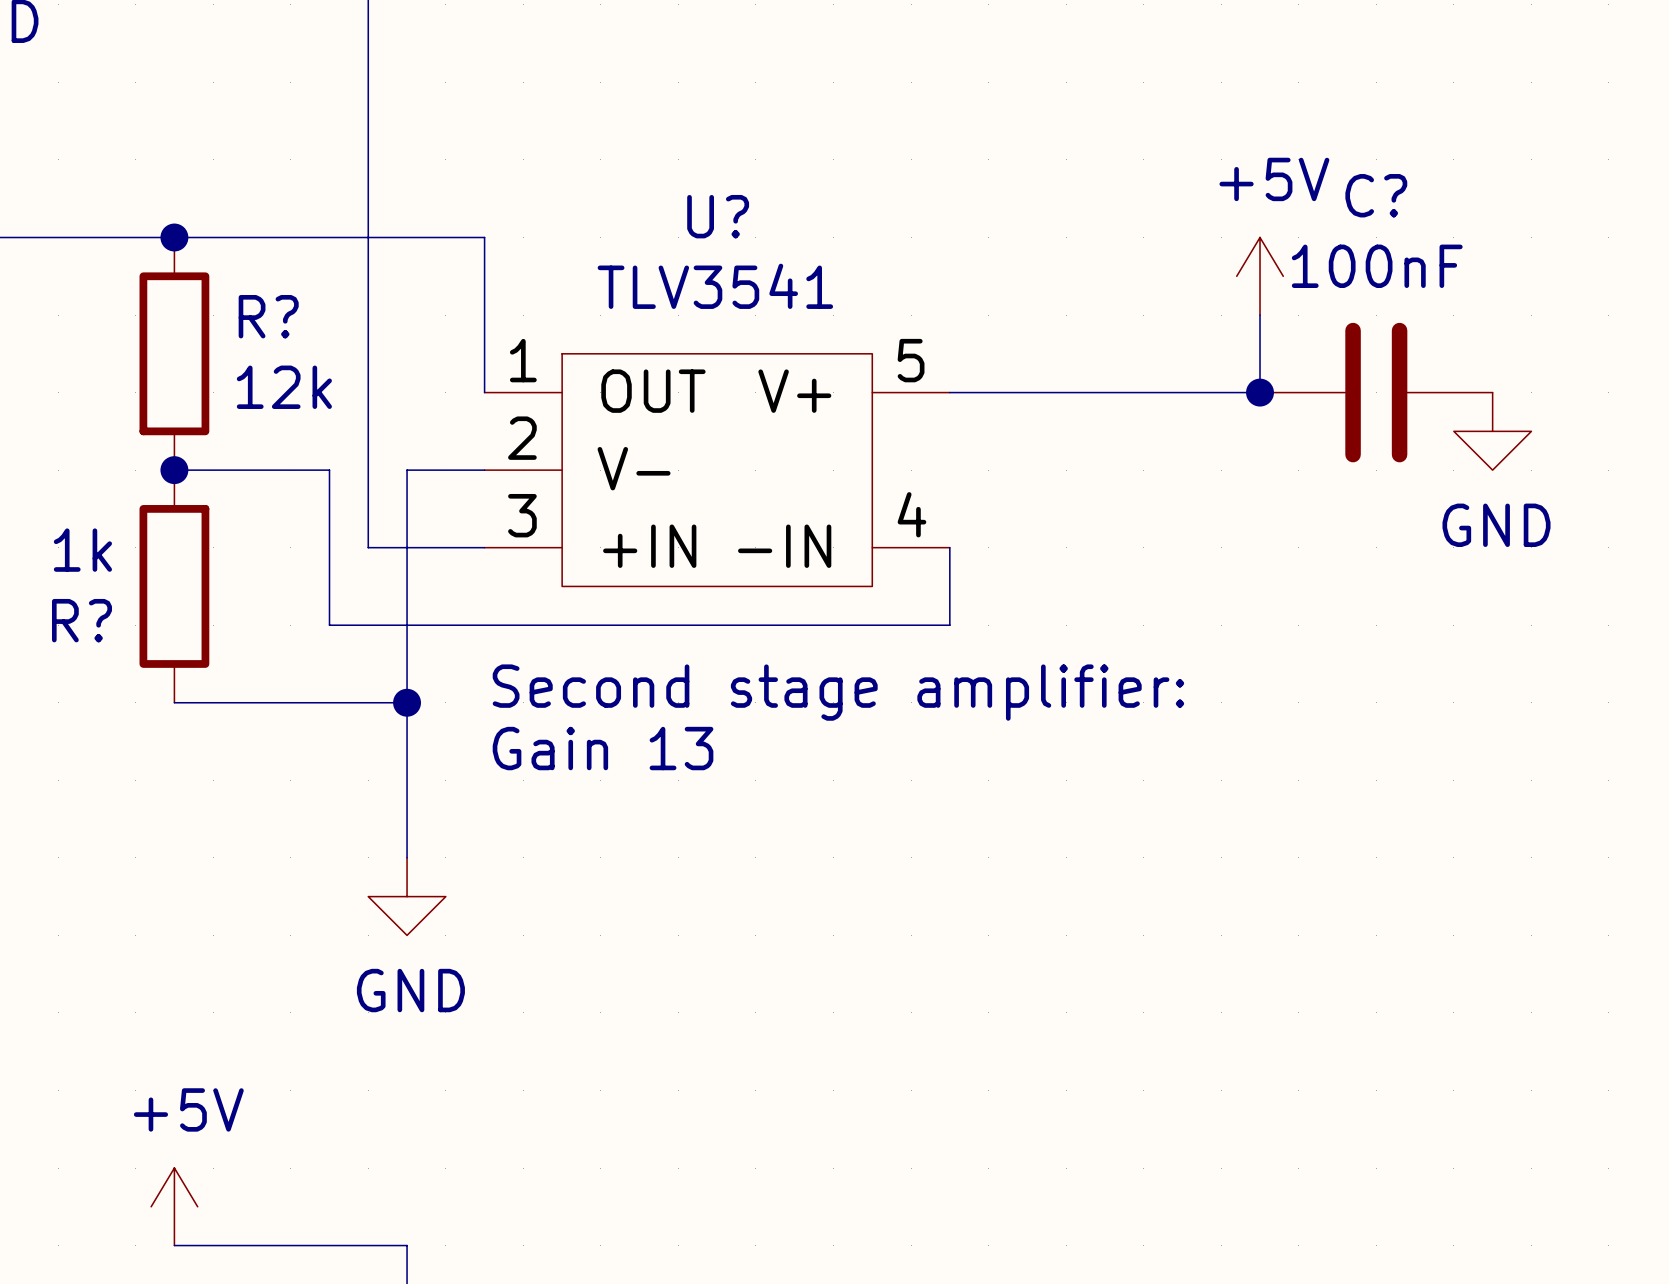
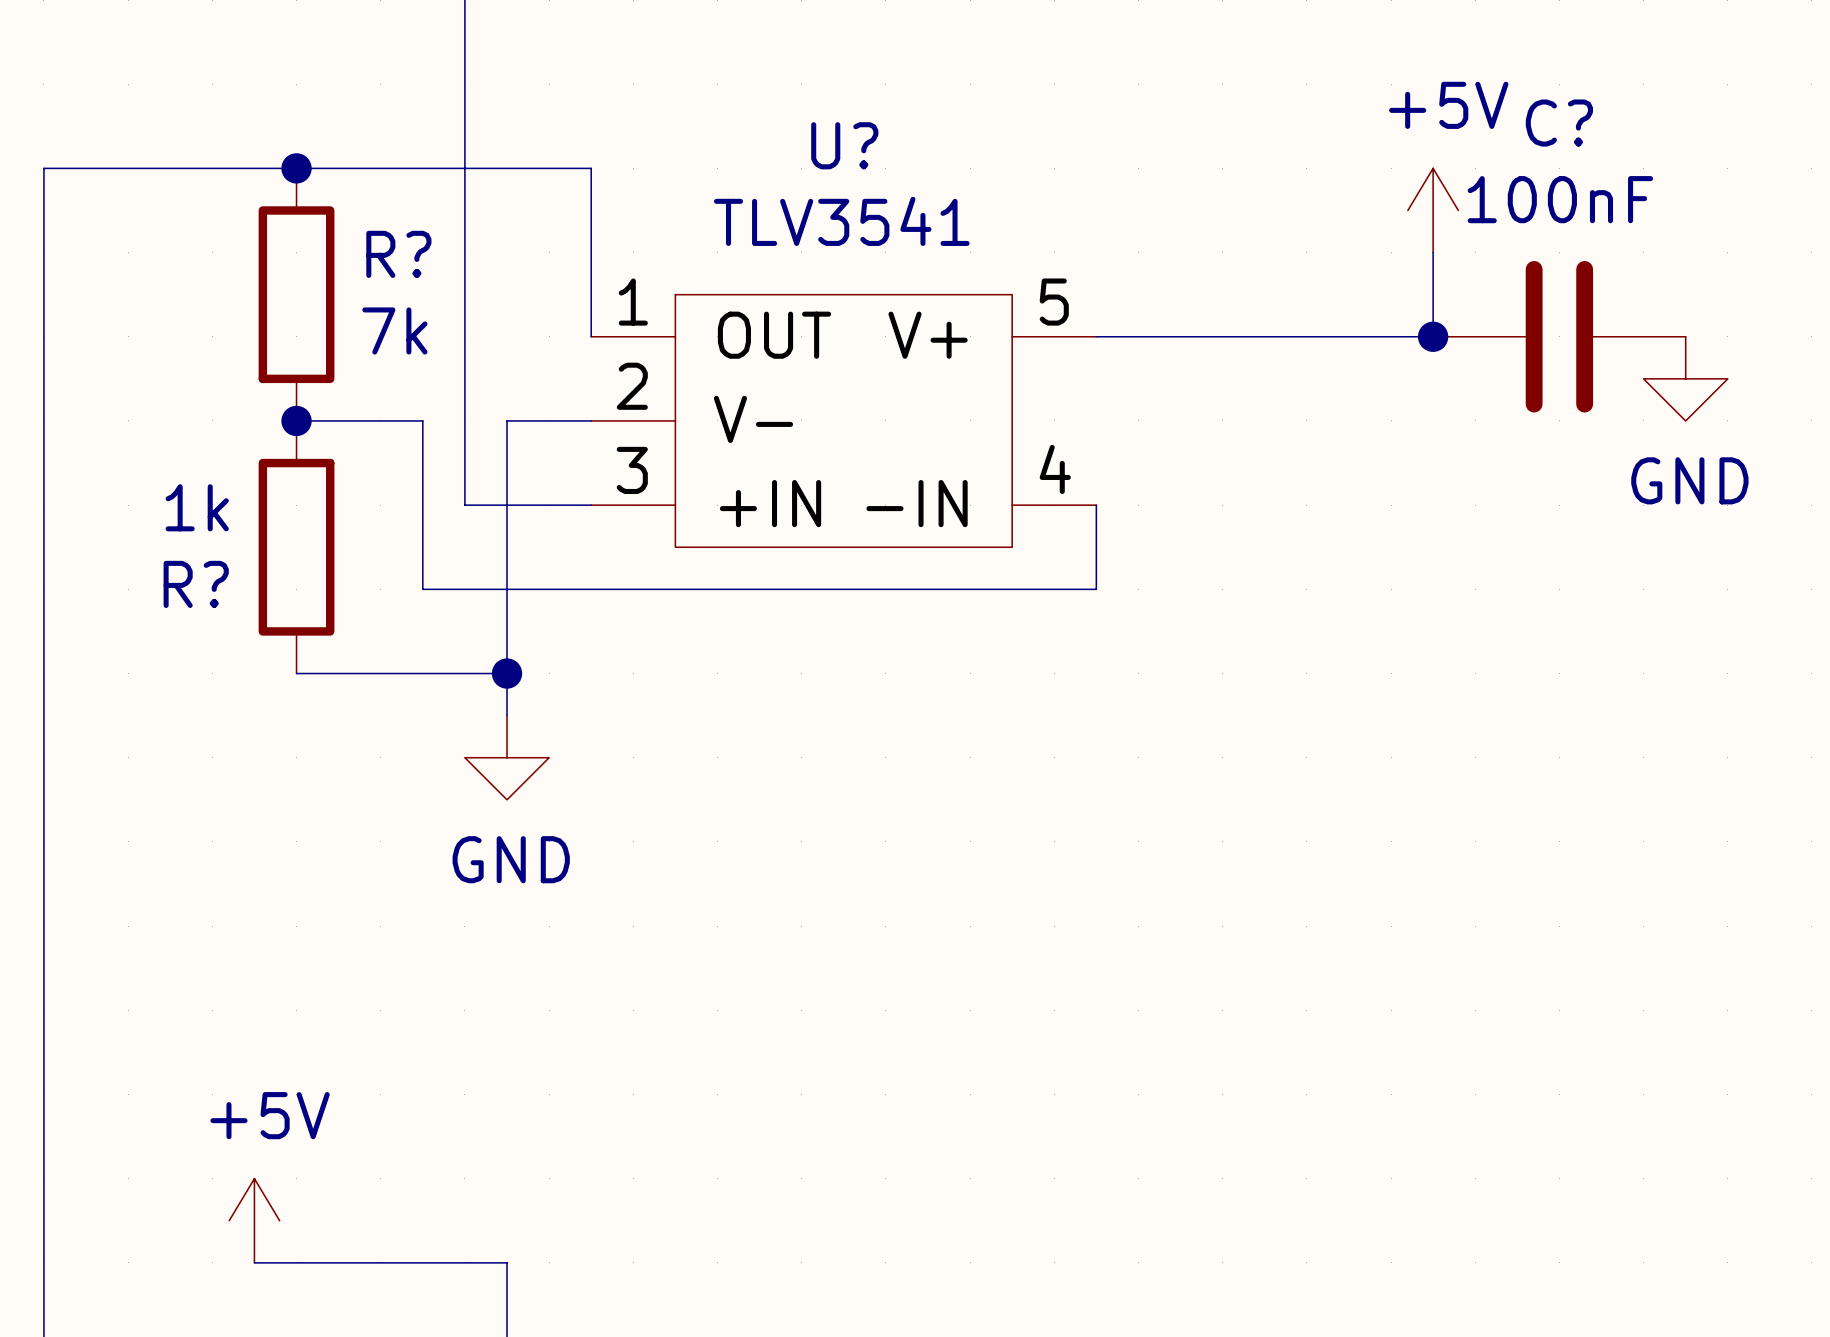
junction position: (174, 237) -> (296, 168)
R?: 12k (174, 353) -> none
R?: none -> 7k (296, 294)
wire: (174, 470) (213, 470) -> none
junction position: (174, 470) -> (296, 420)
R? position: (174, 586) -> (296, 547)
text: Second stage amplifier: (838, 692) -> none
wire: (174, 702) (213, 702) -> none
wire: (407, 741) (407, 857) -> none
text: Gain 13 (603, 748) -> none
power symbol position: GND (407, 896) -> GND (507, 757)

